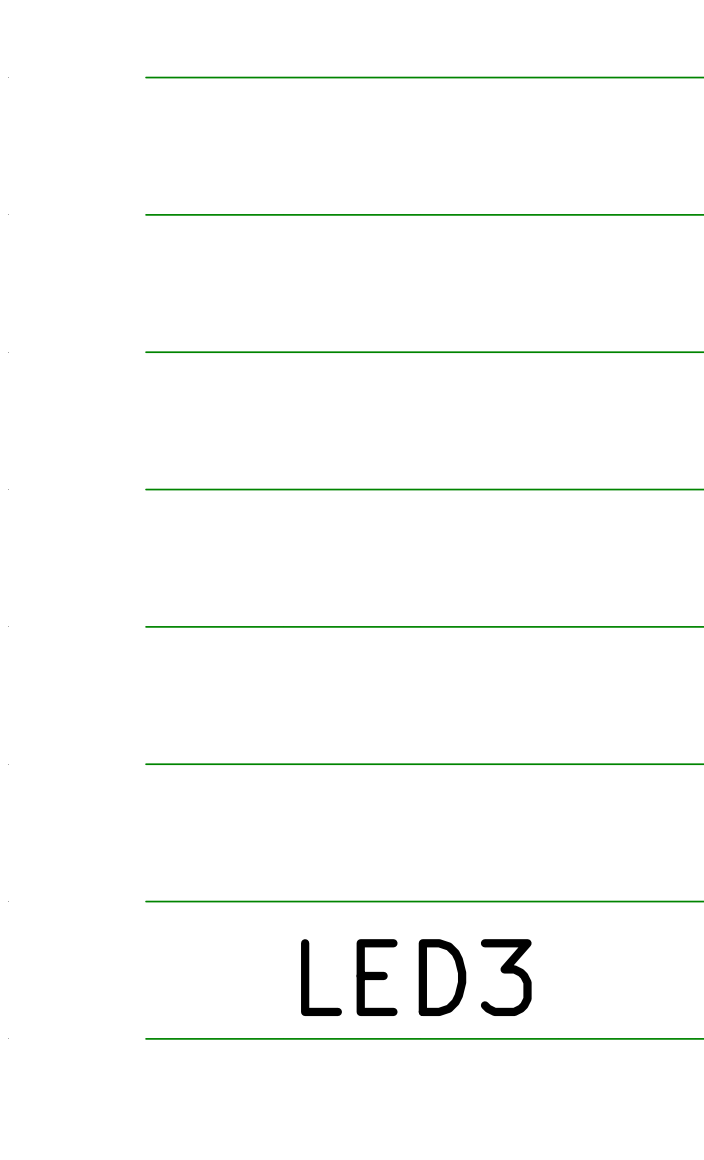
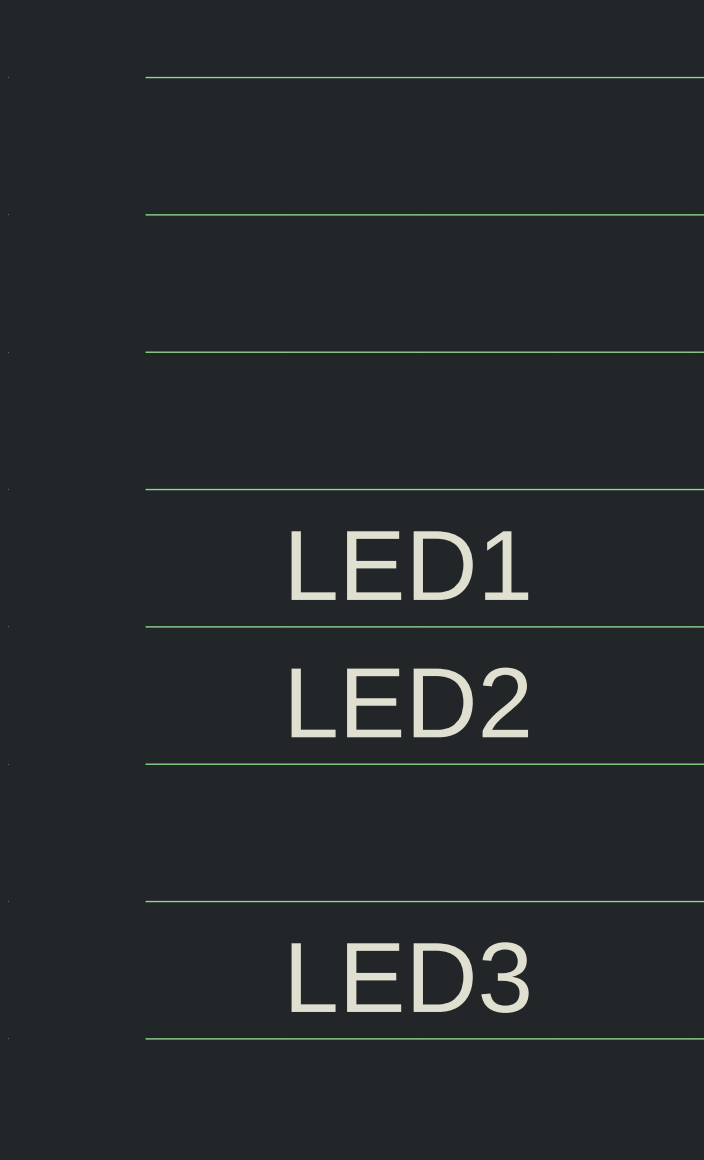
label: none -> LED1 (409, 565)
label: none -> LED2 (409, 702)

